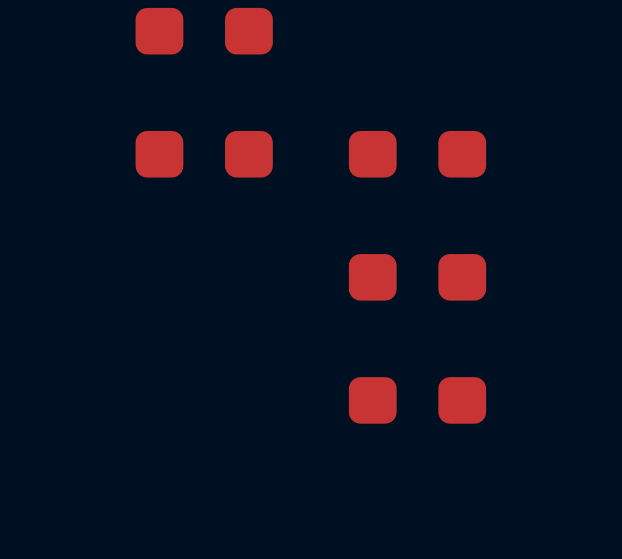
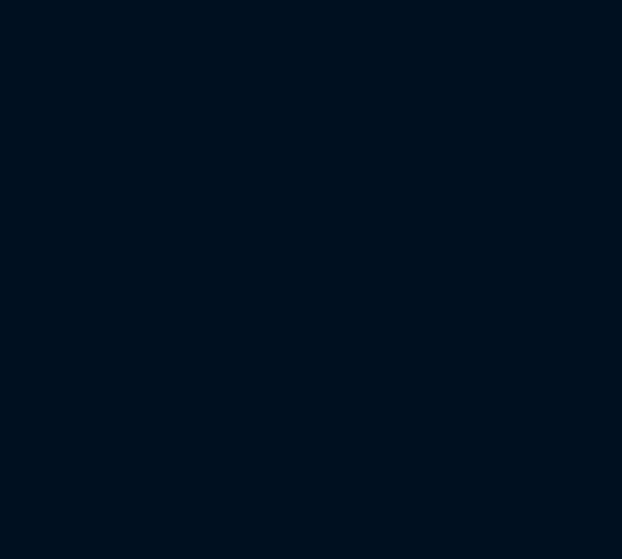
part: (204, 31) -> none
part: (204, 154) -> none
part: (417, 154) -> none
part: (417, 277) -> none
part: (417, 400) -> none

